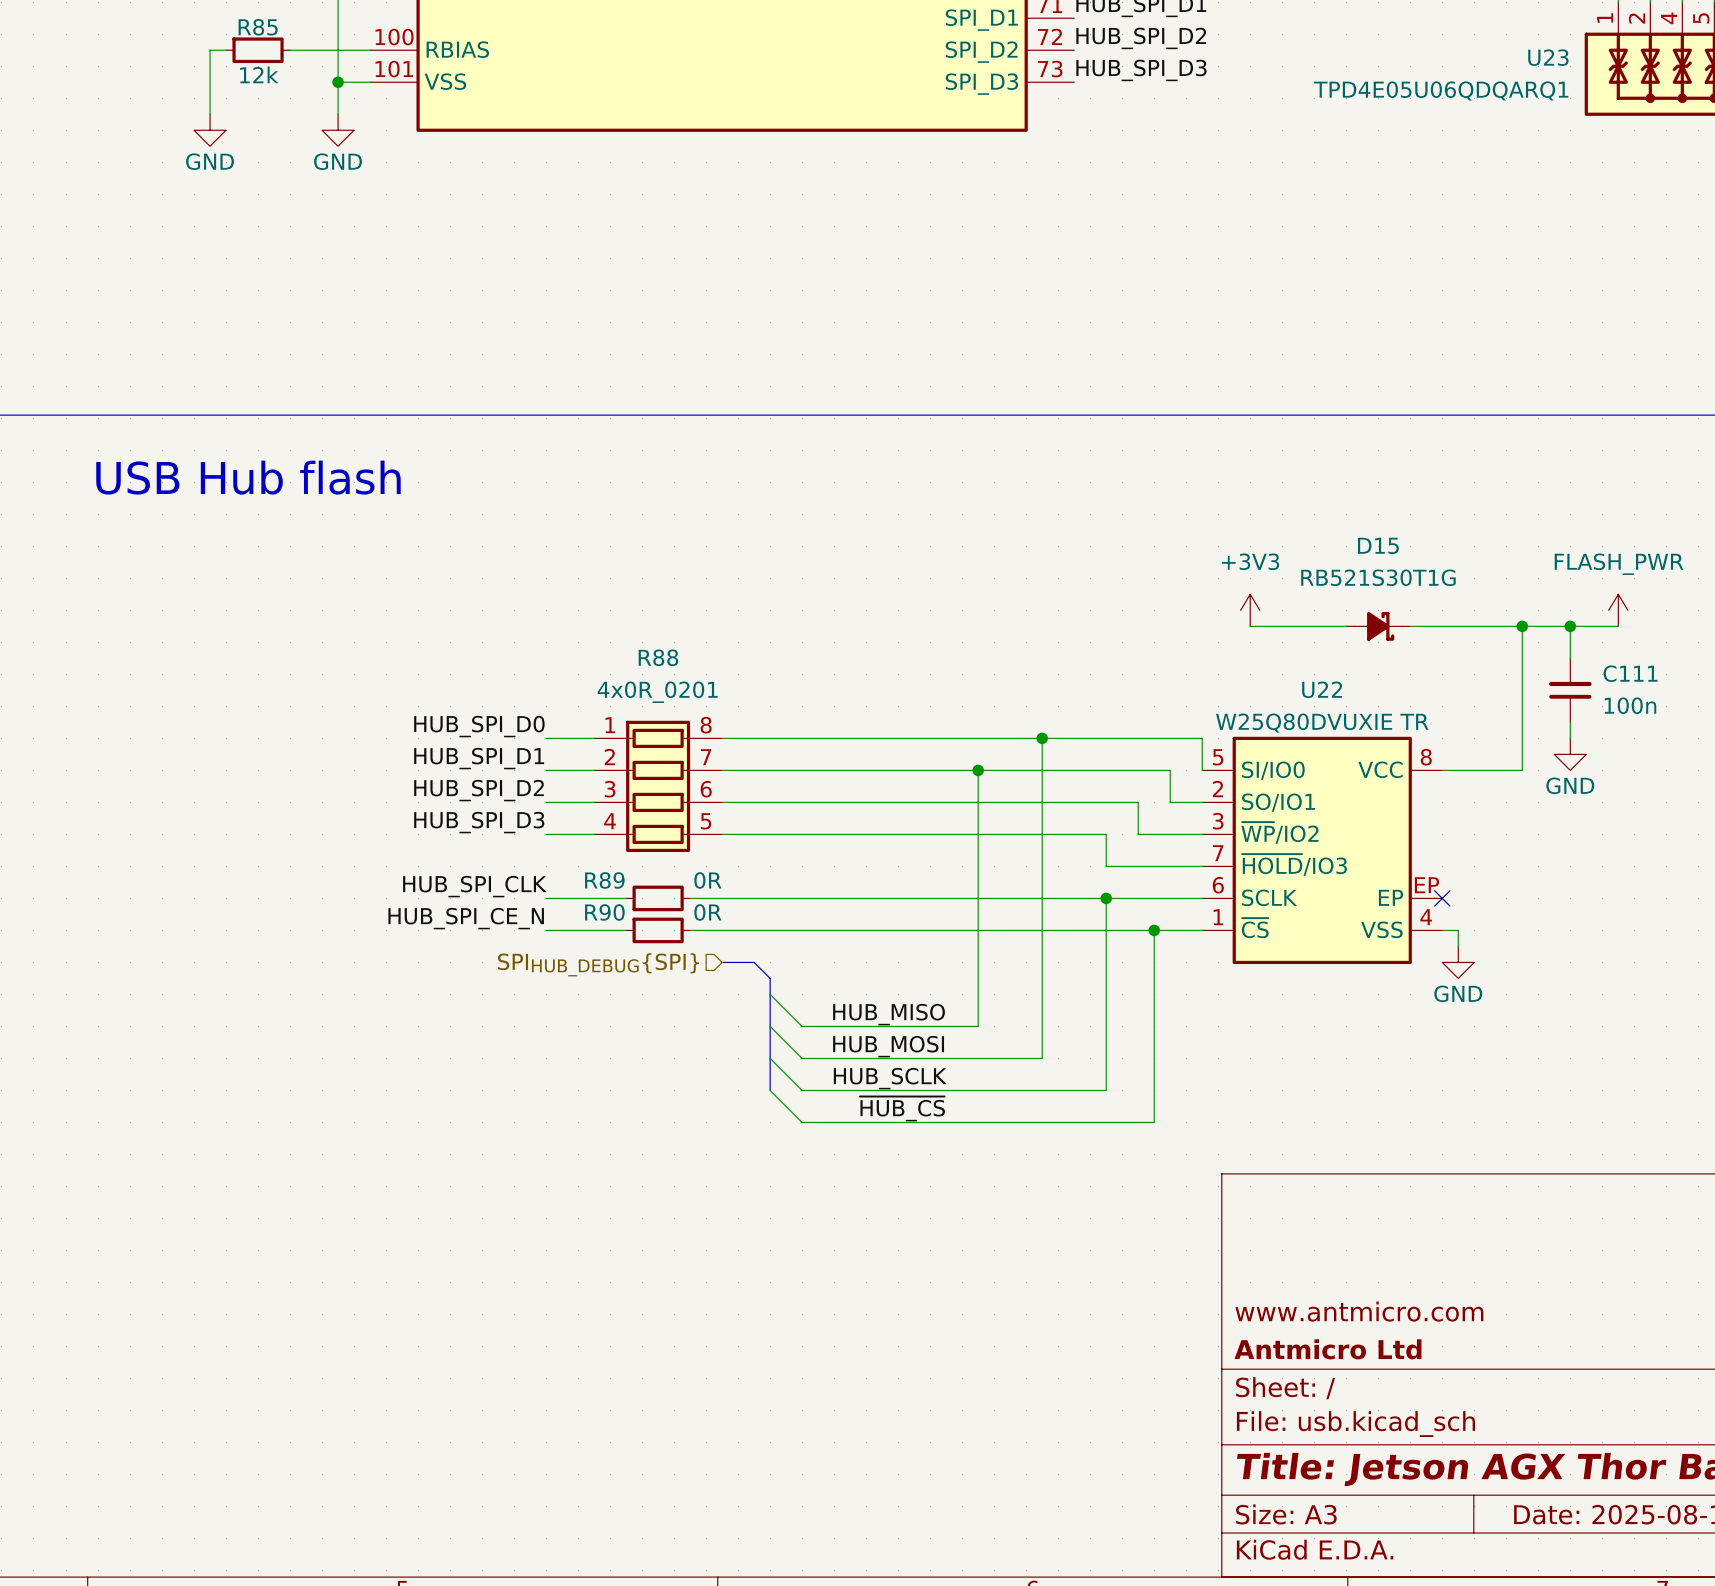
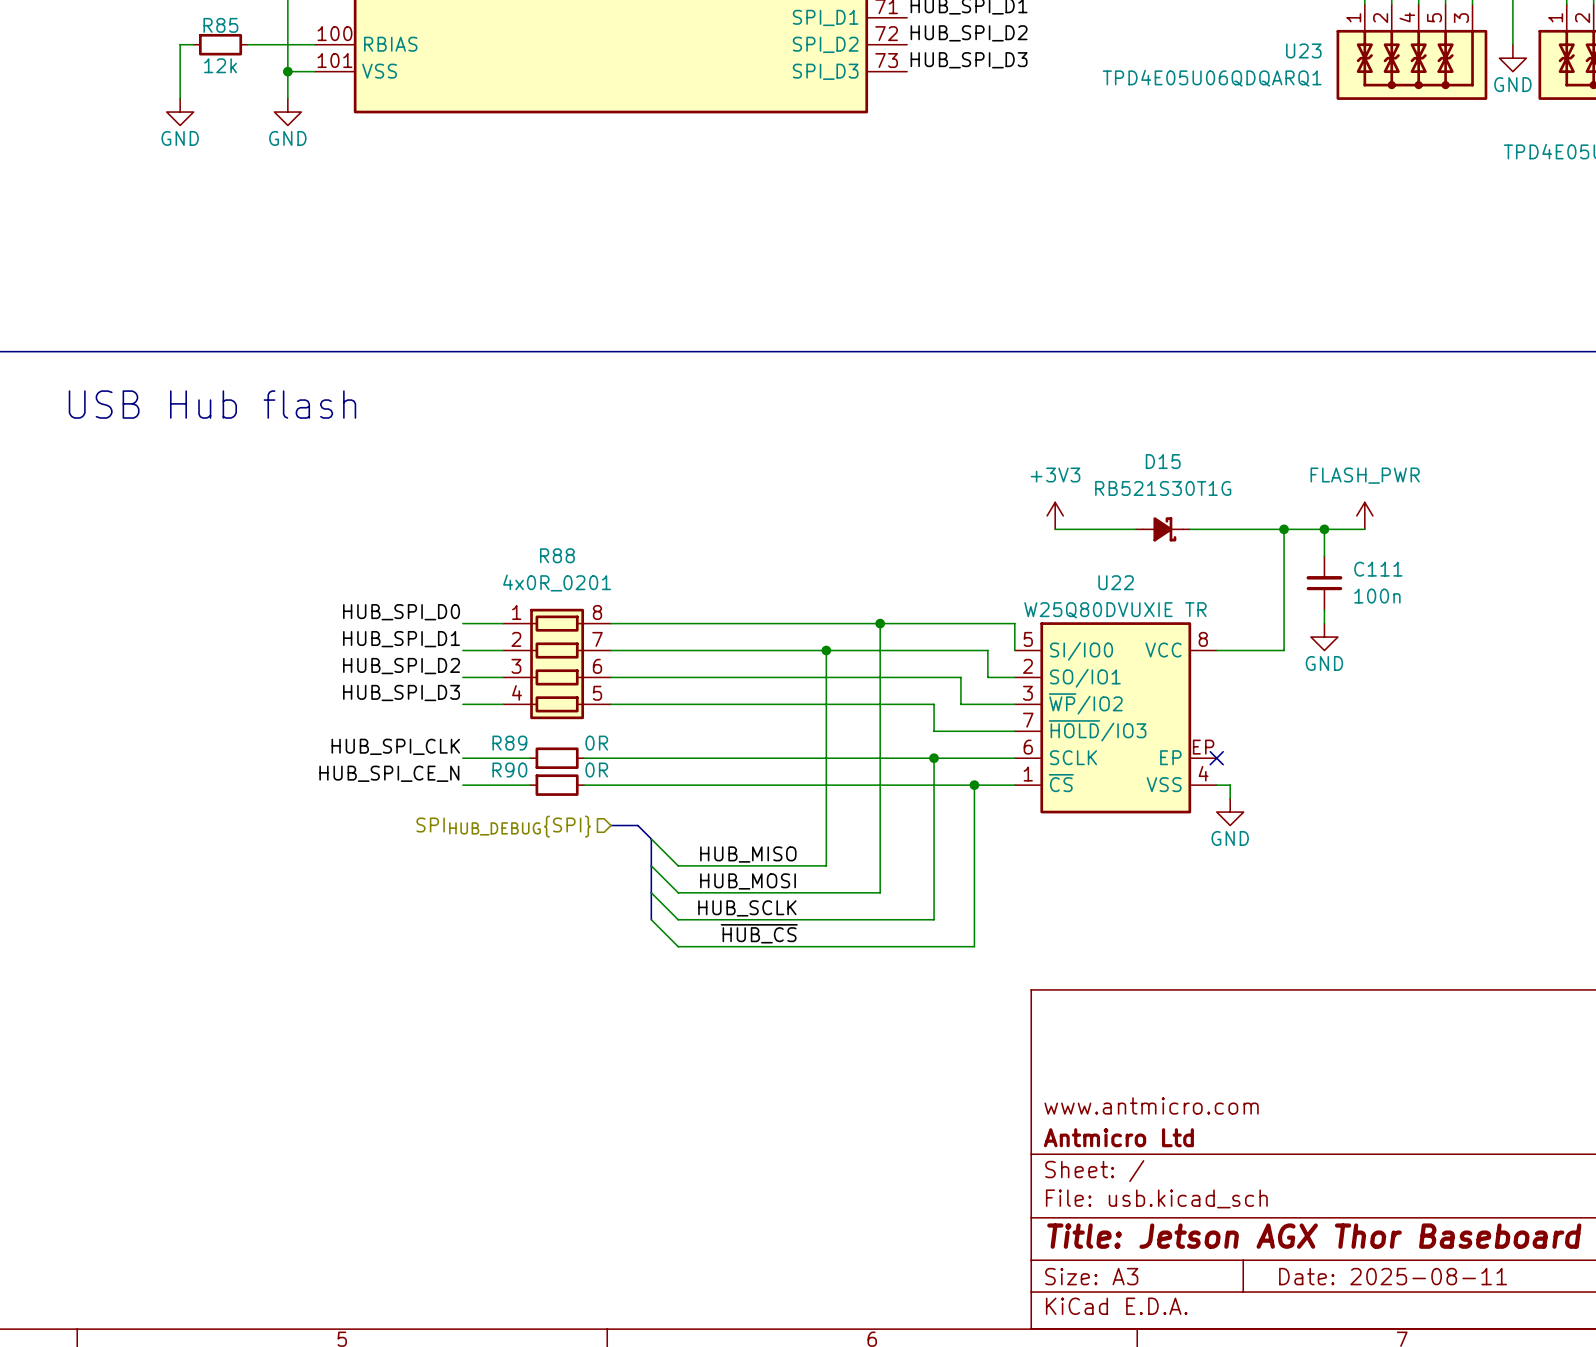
bus: (722, 962) (754, 962) (770, 978) (770, 994) -> (610, 825) (637, 825) (651, 838)
hierarchical label position: SPIHUB_DEBUG{SPI} (598, 964) -> SPIHUB_DEBUG{SPI} (503, 826)

